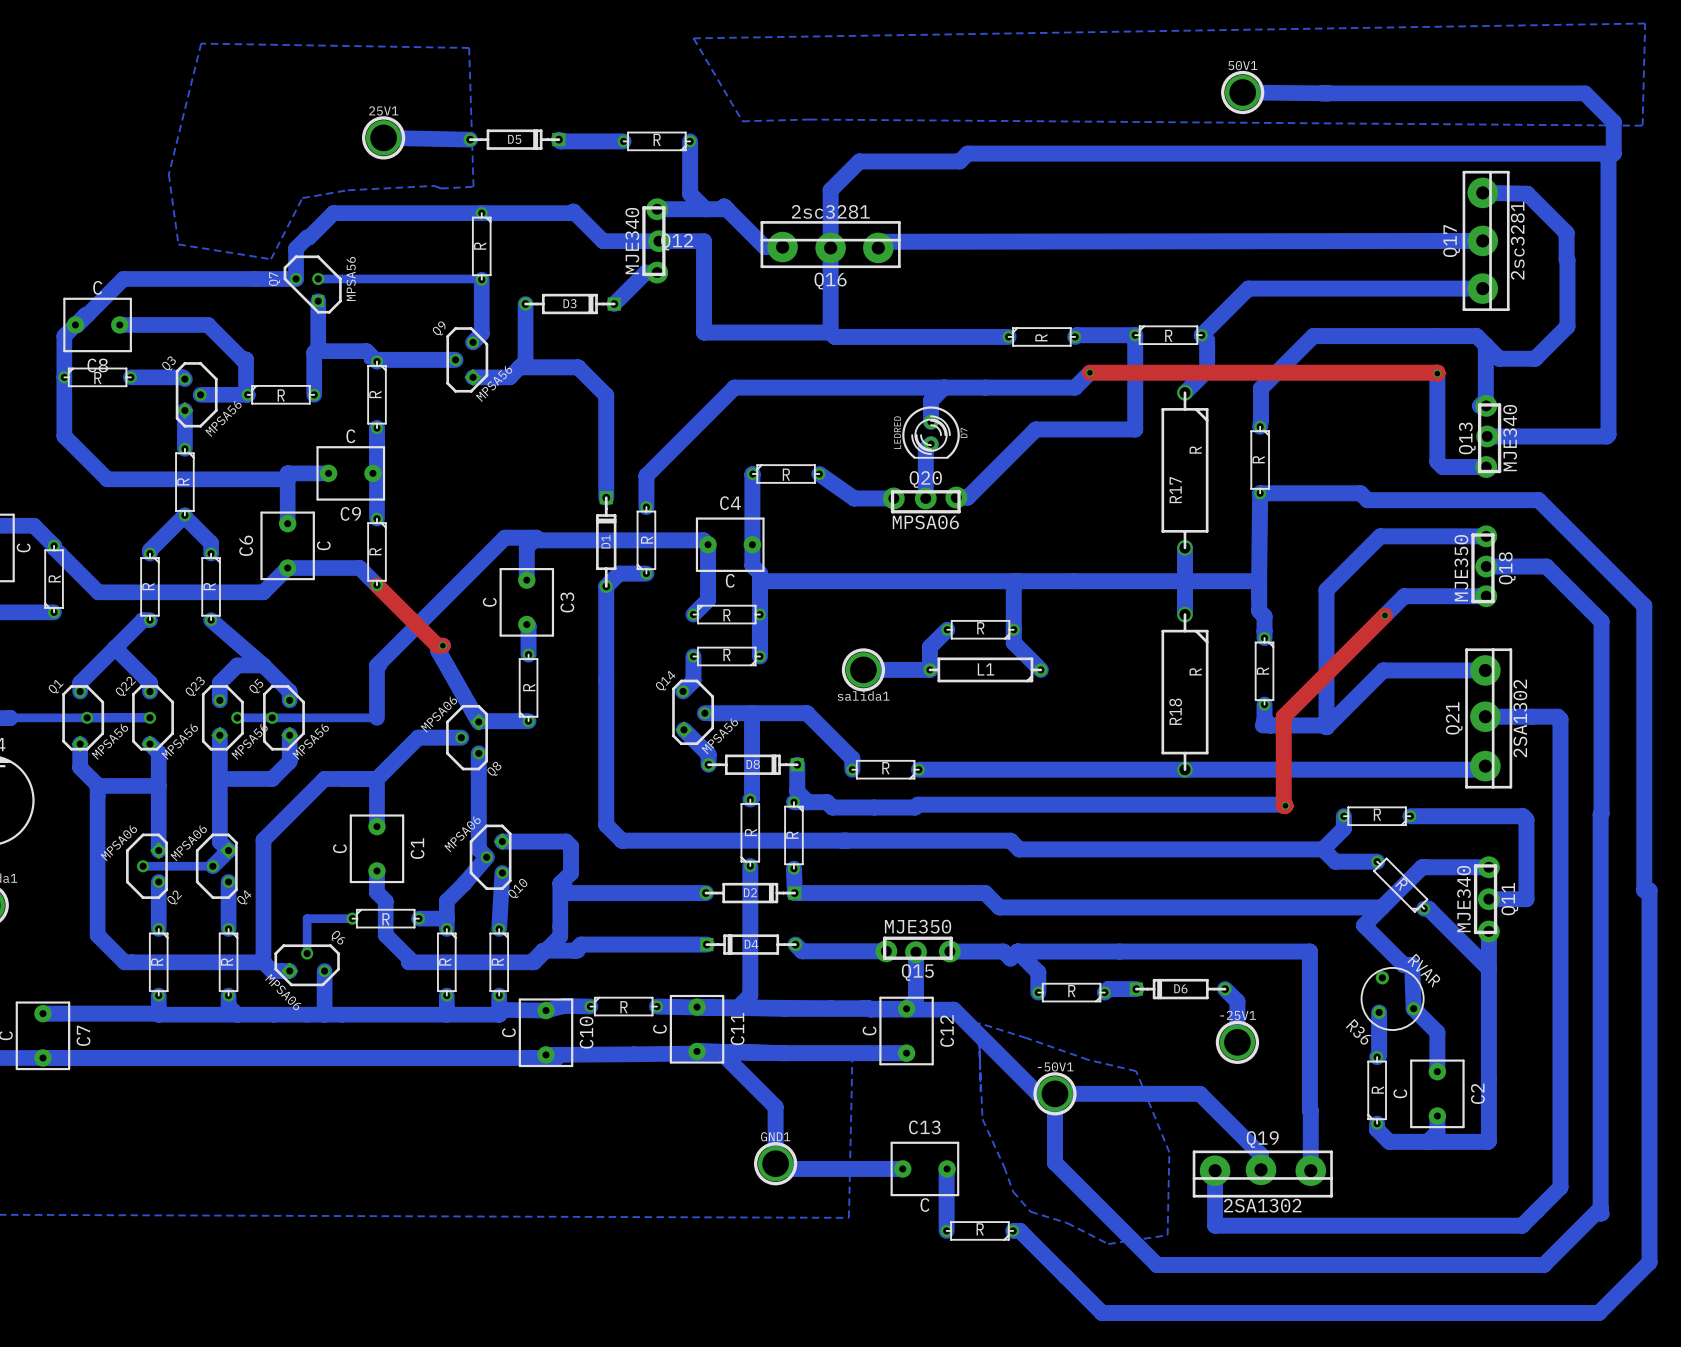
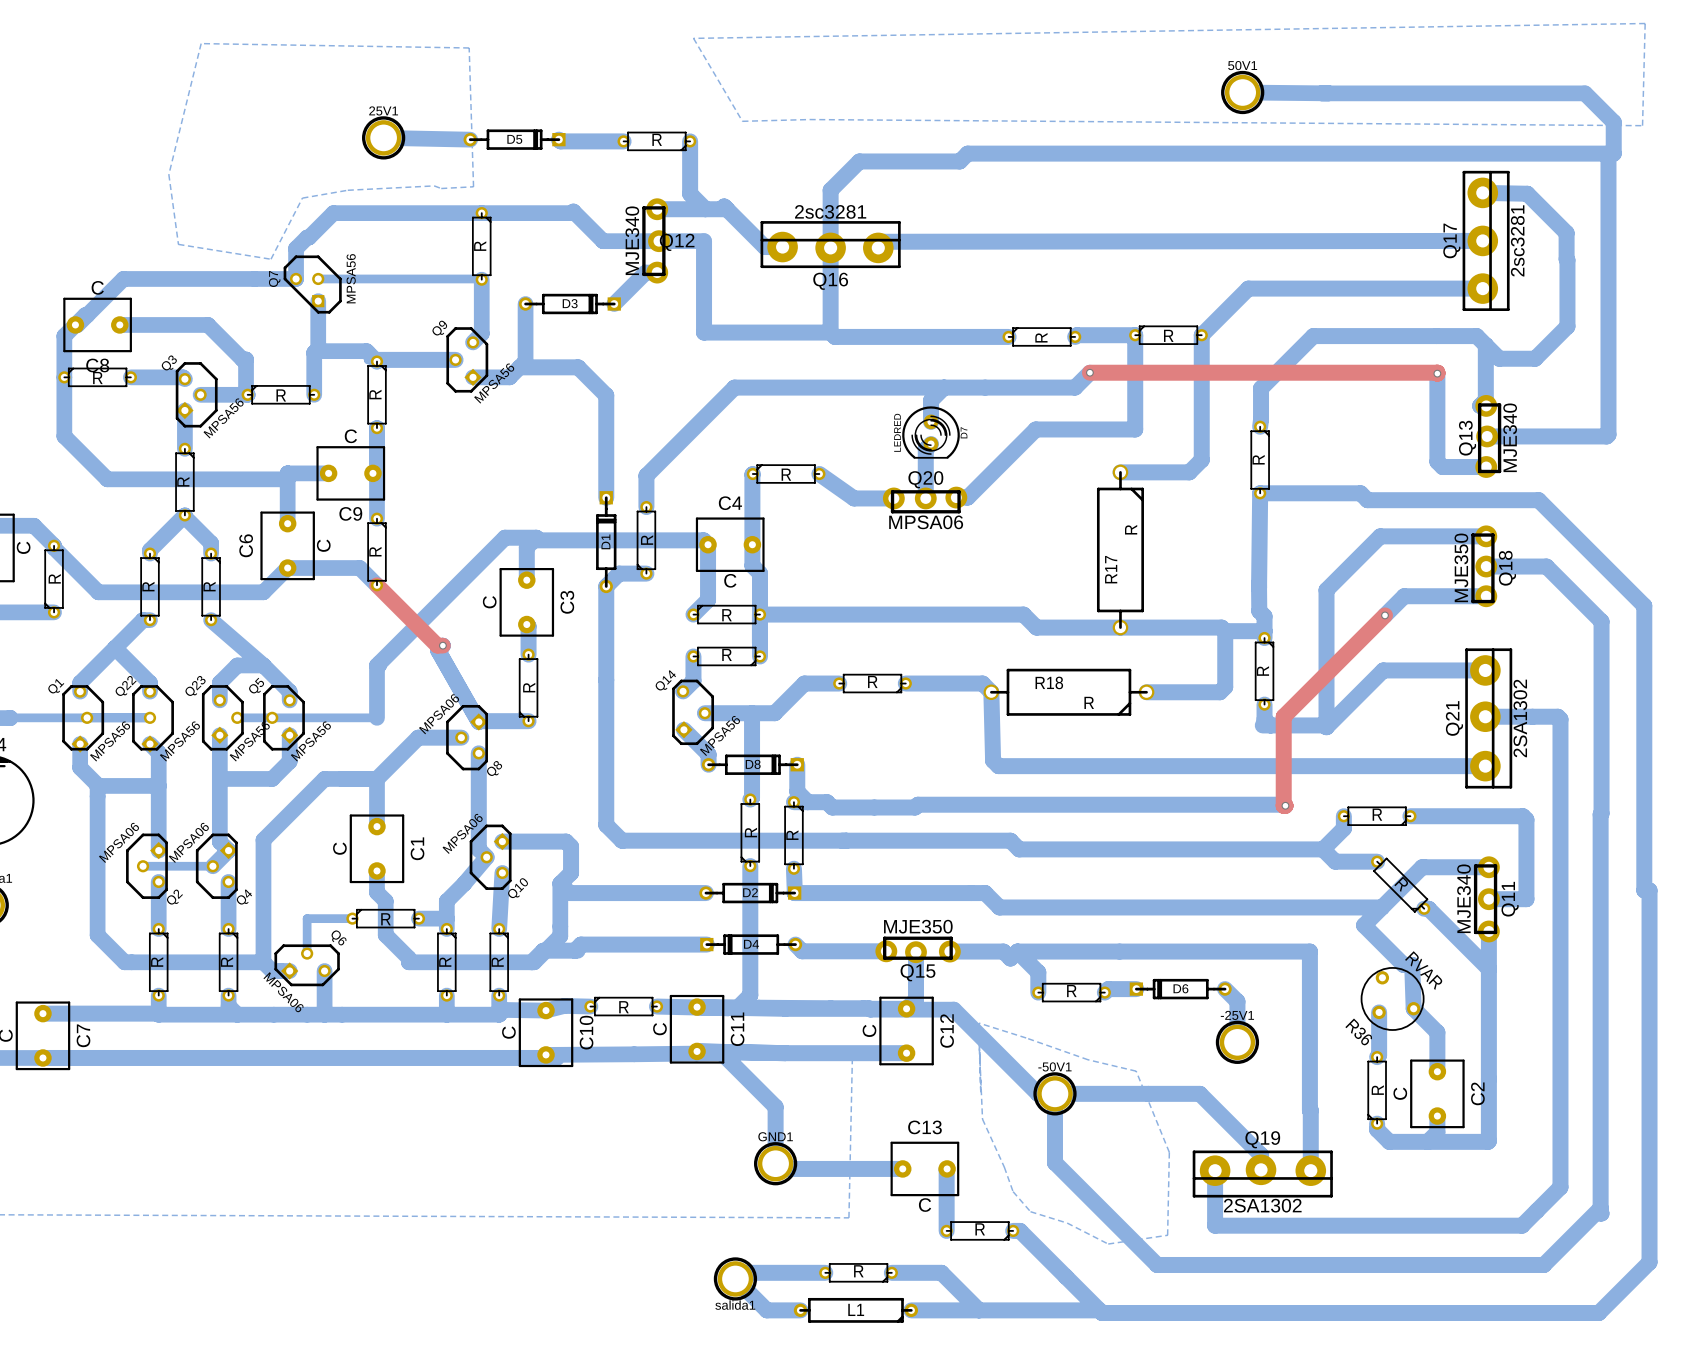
bottom track: (1201, 335) (1207, 340) (1207, 370) (1184, 392) -> (1201, 335) (1201, 459) (1189, 472) (1120, 472)
R17 position: (1184, 470) -> (1120, 549)
bottom track: (1184, 547) (1184, 614) -> none
bottom track: (760, 581) (1259, 581) (1259, 597) -> none
bottom track: (1013, 581) (1013, 642) (1040, 669) -> none
bottom track: none -> (760, 614) (1023, 614) (1036, 627) (1221, 627) (1225, 631)
bottom track: (947, 629) (929, 647) (929, 669) (863, 669) -> none
part: R (980, 629) -> none
bottom track: none -> (1225, 631) (1225, 687) (1219, 692) (1146, 692)
bottom track: none -> (1225, 631) (1264, 631)
salida1 position: (863, 669) -> (735, 1278)
L1 position: (985, 669) -> (855, 1310)
part: none -> R (872, 683)
R18 rotation: 0° (1184, 692) -> 90° clockwise (1068, 692)
R18 position: (1184, 692) -> (1068, 692)
bottom track: (774, 713) (806, 713) (852, 758) (852, 769) -> (774, 713) (804, 683) (839, 683)
bottom track: (1485, 766) (1481, 769) (918, 769) -> (1485, 766) (998, 766) (993, 760) (991, 692) (982, 683) (905, 683)
part: R (885, 769) -> none
bottom track: none -> (825, 1272) (741, 1272) (735, 1278) (766, 1310) (800, 1310)
part: none -> R (858, 1272)
bottom track: none -> (891, 1272) (941, 1272) (979, 1310)
bottom track: none -> (911, 1310) (1099, 1310)

